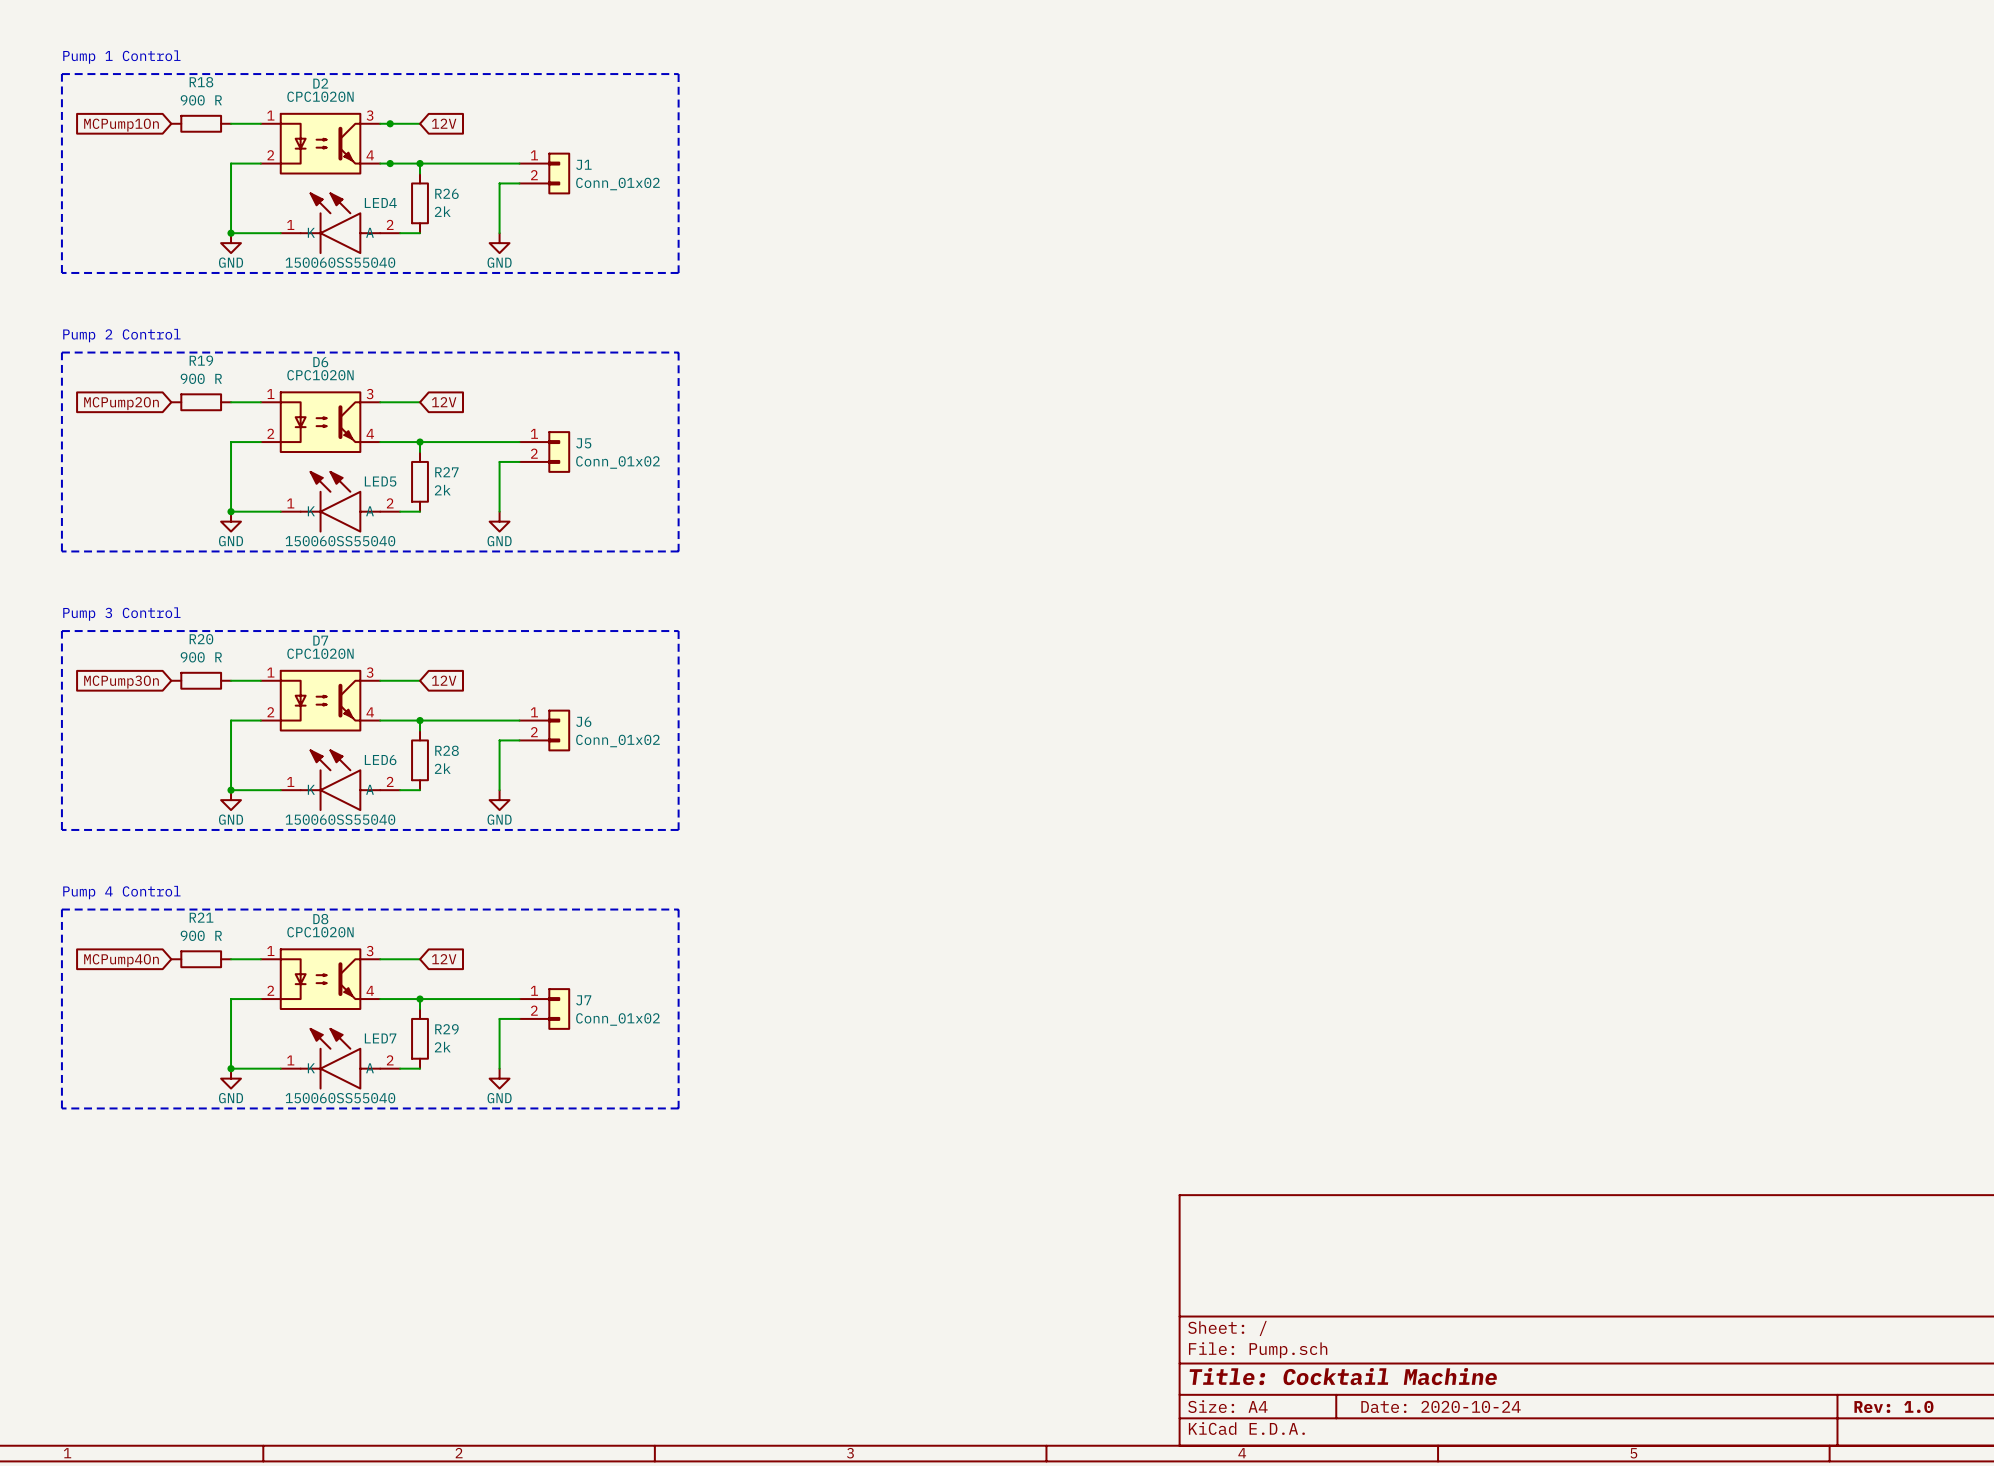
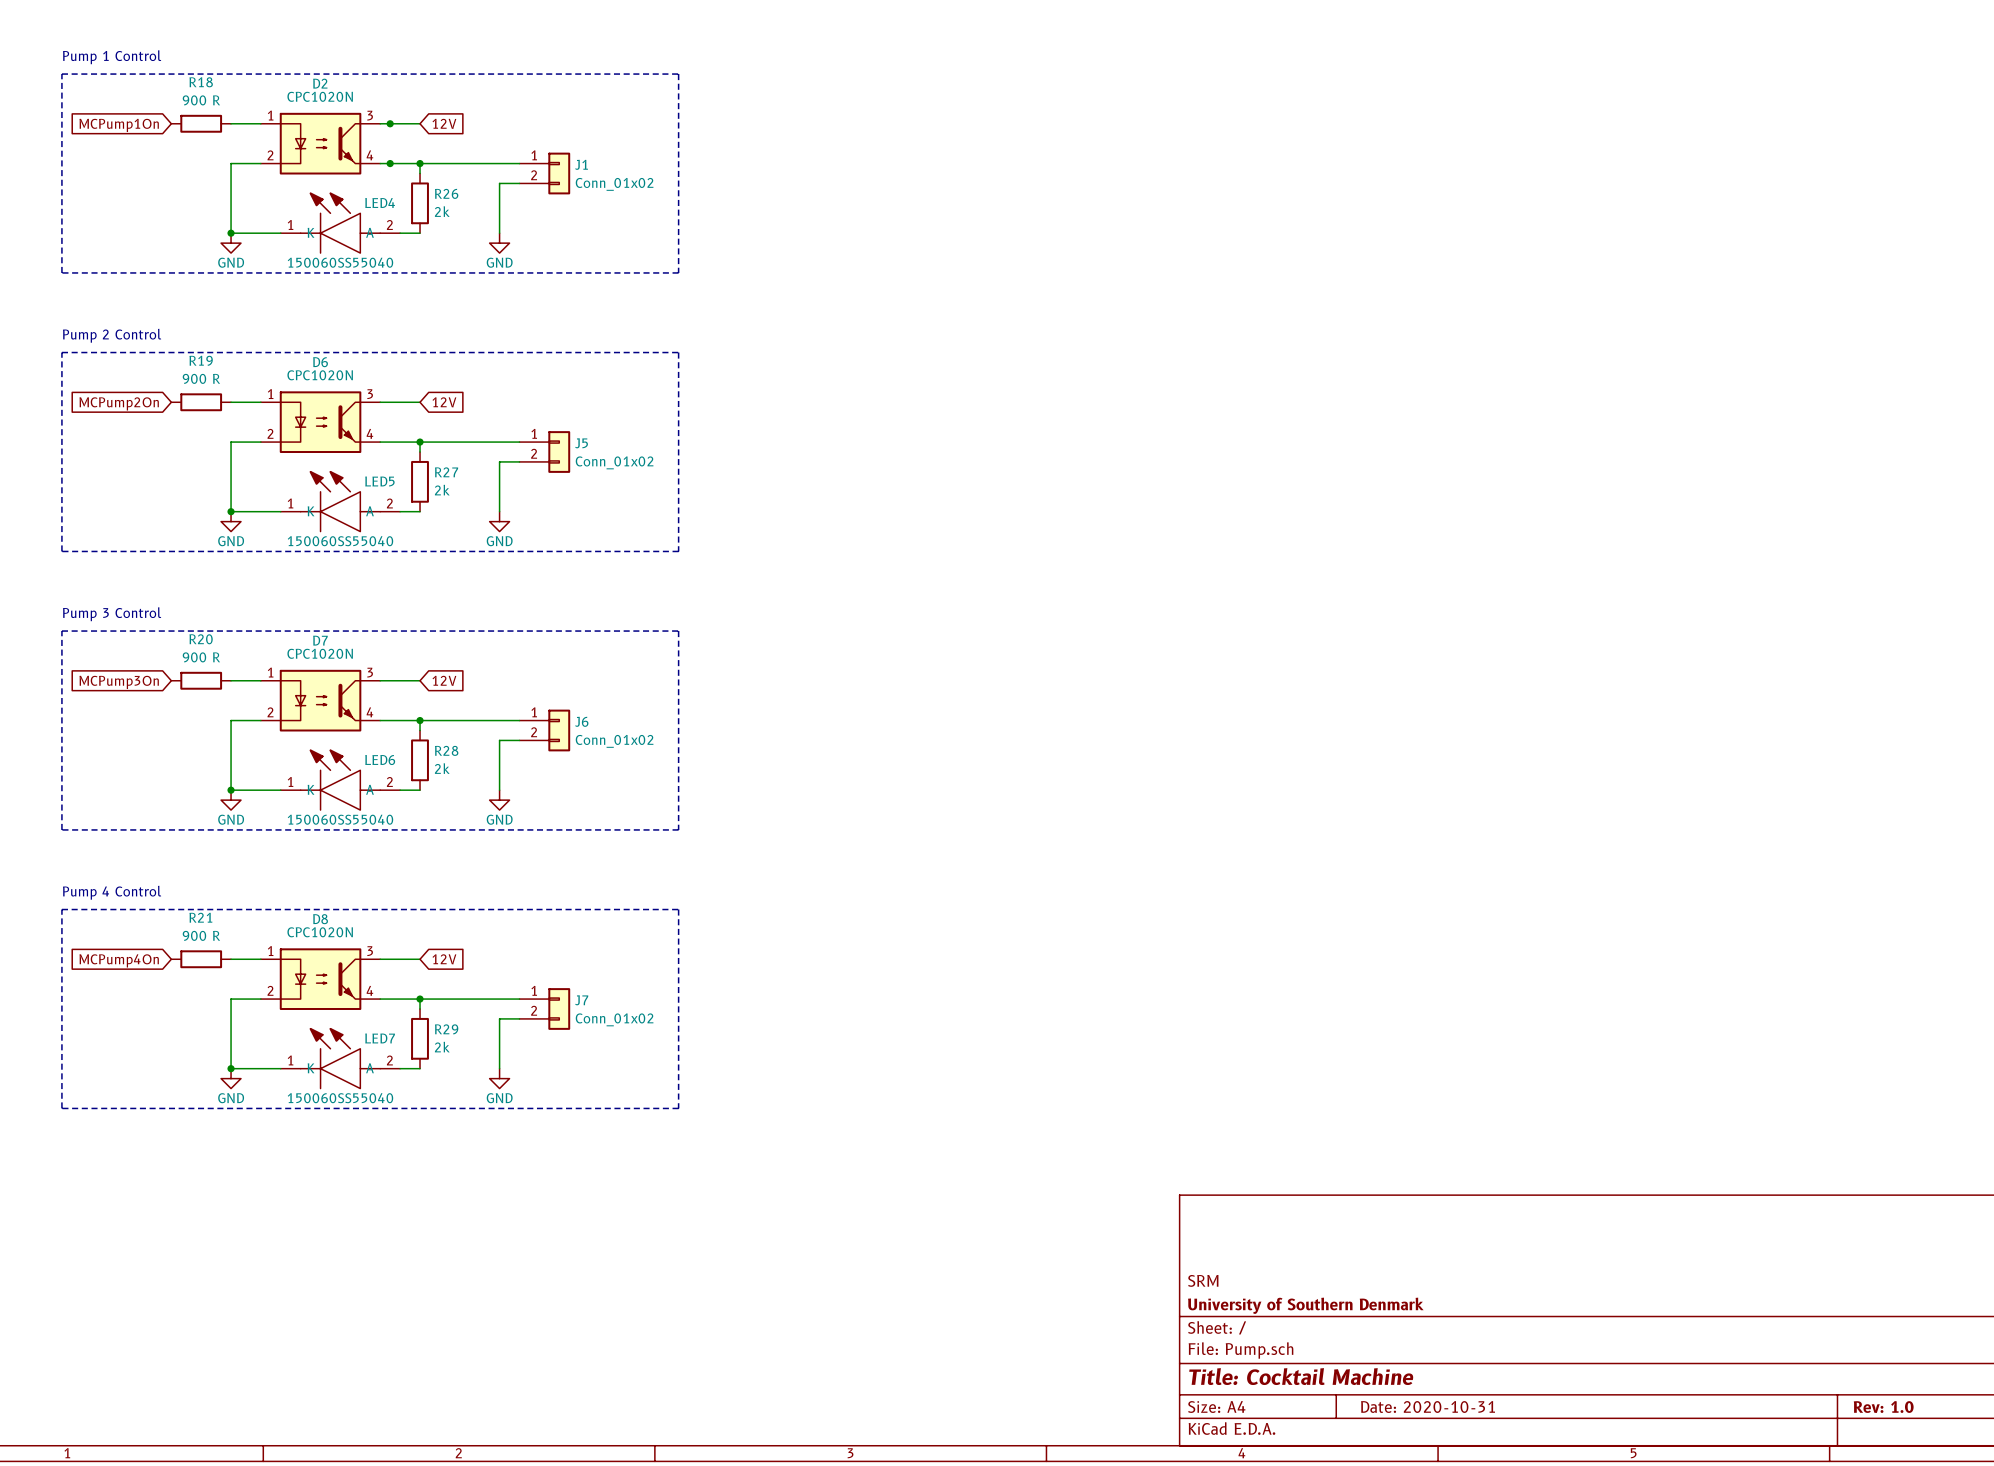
title block: none -> SRM (1203, 1280)
title block: none -> University of Southern Denmark (1305, 1305)
title block: Date: 2020-10-24 (1441, 1406) -> Date: 2020-10-31 (1428, 1406)

